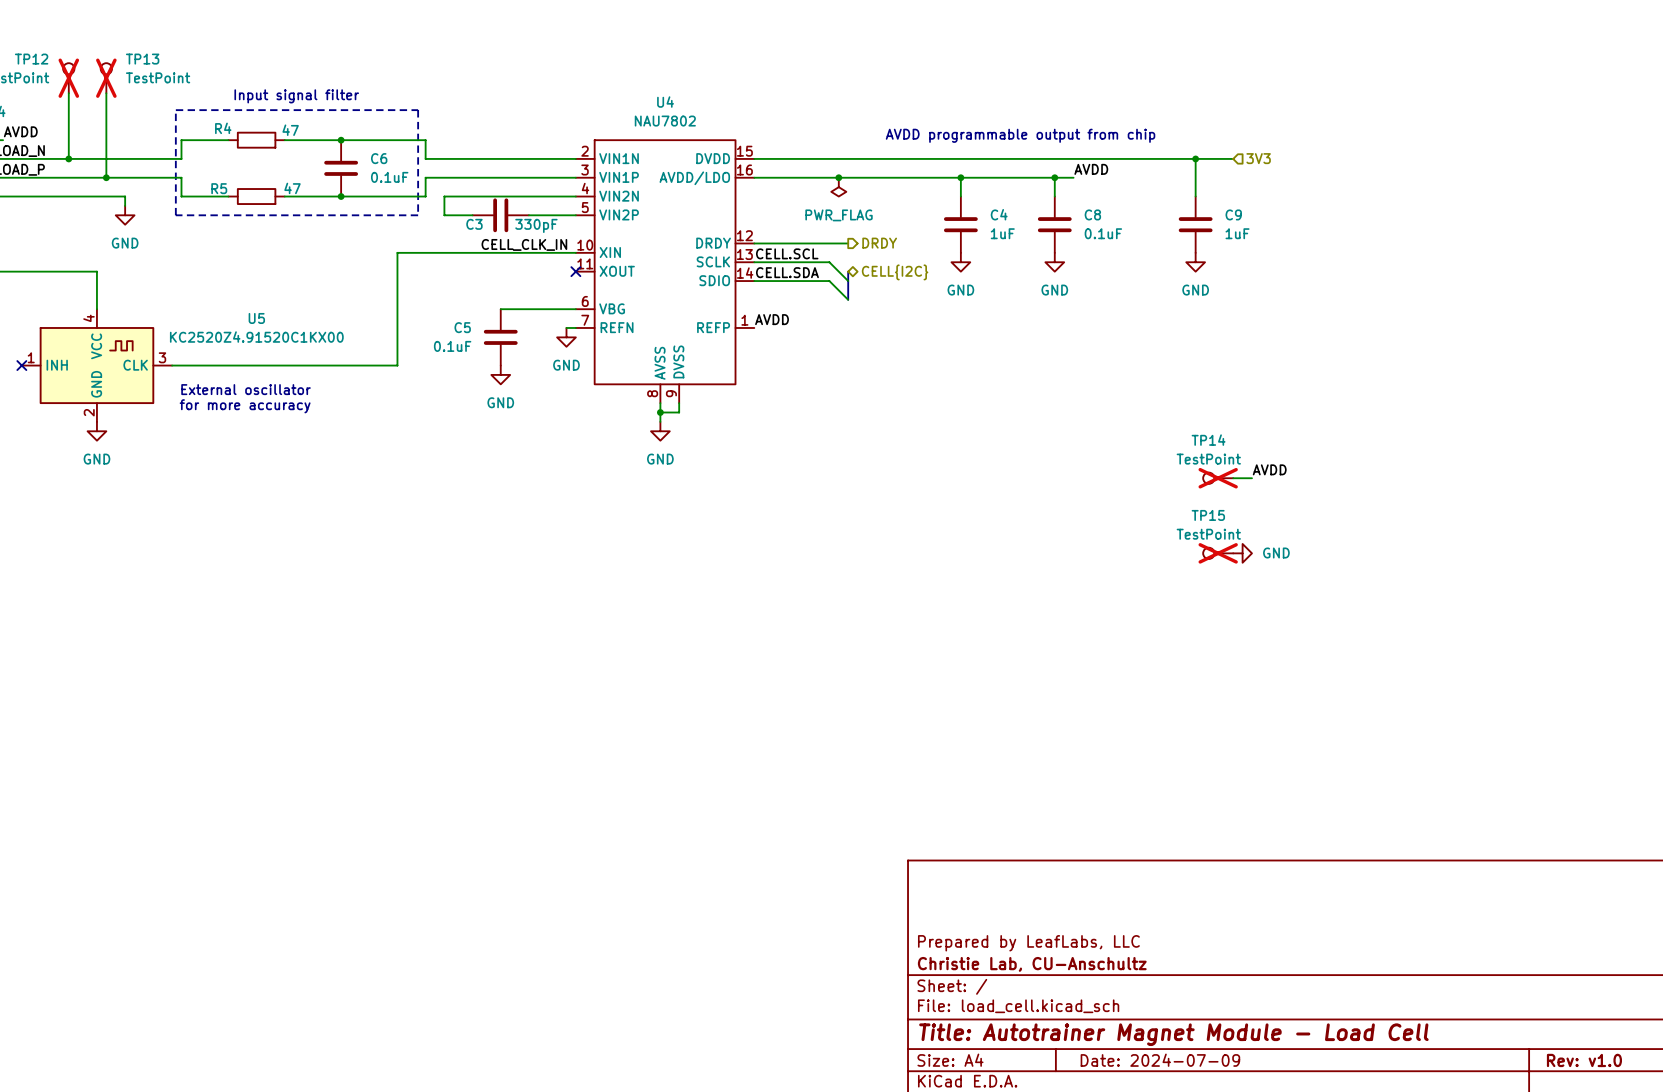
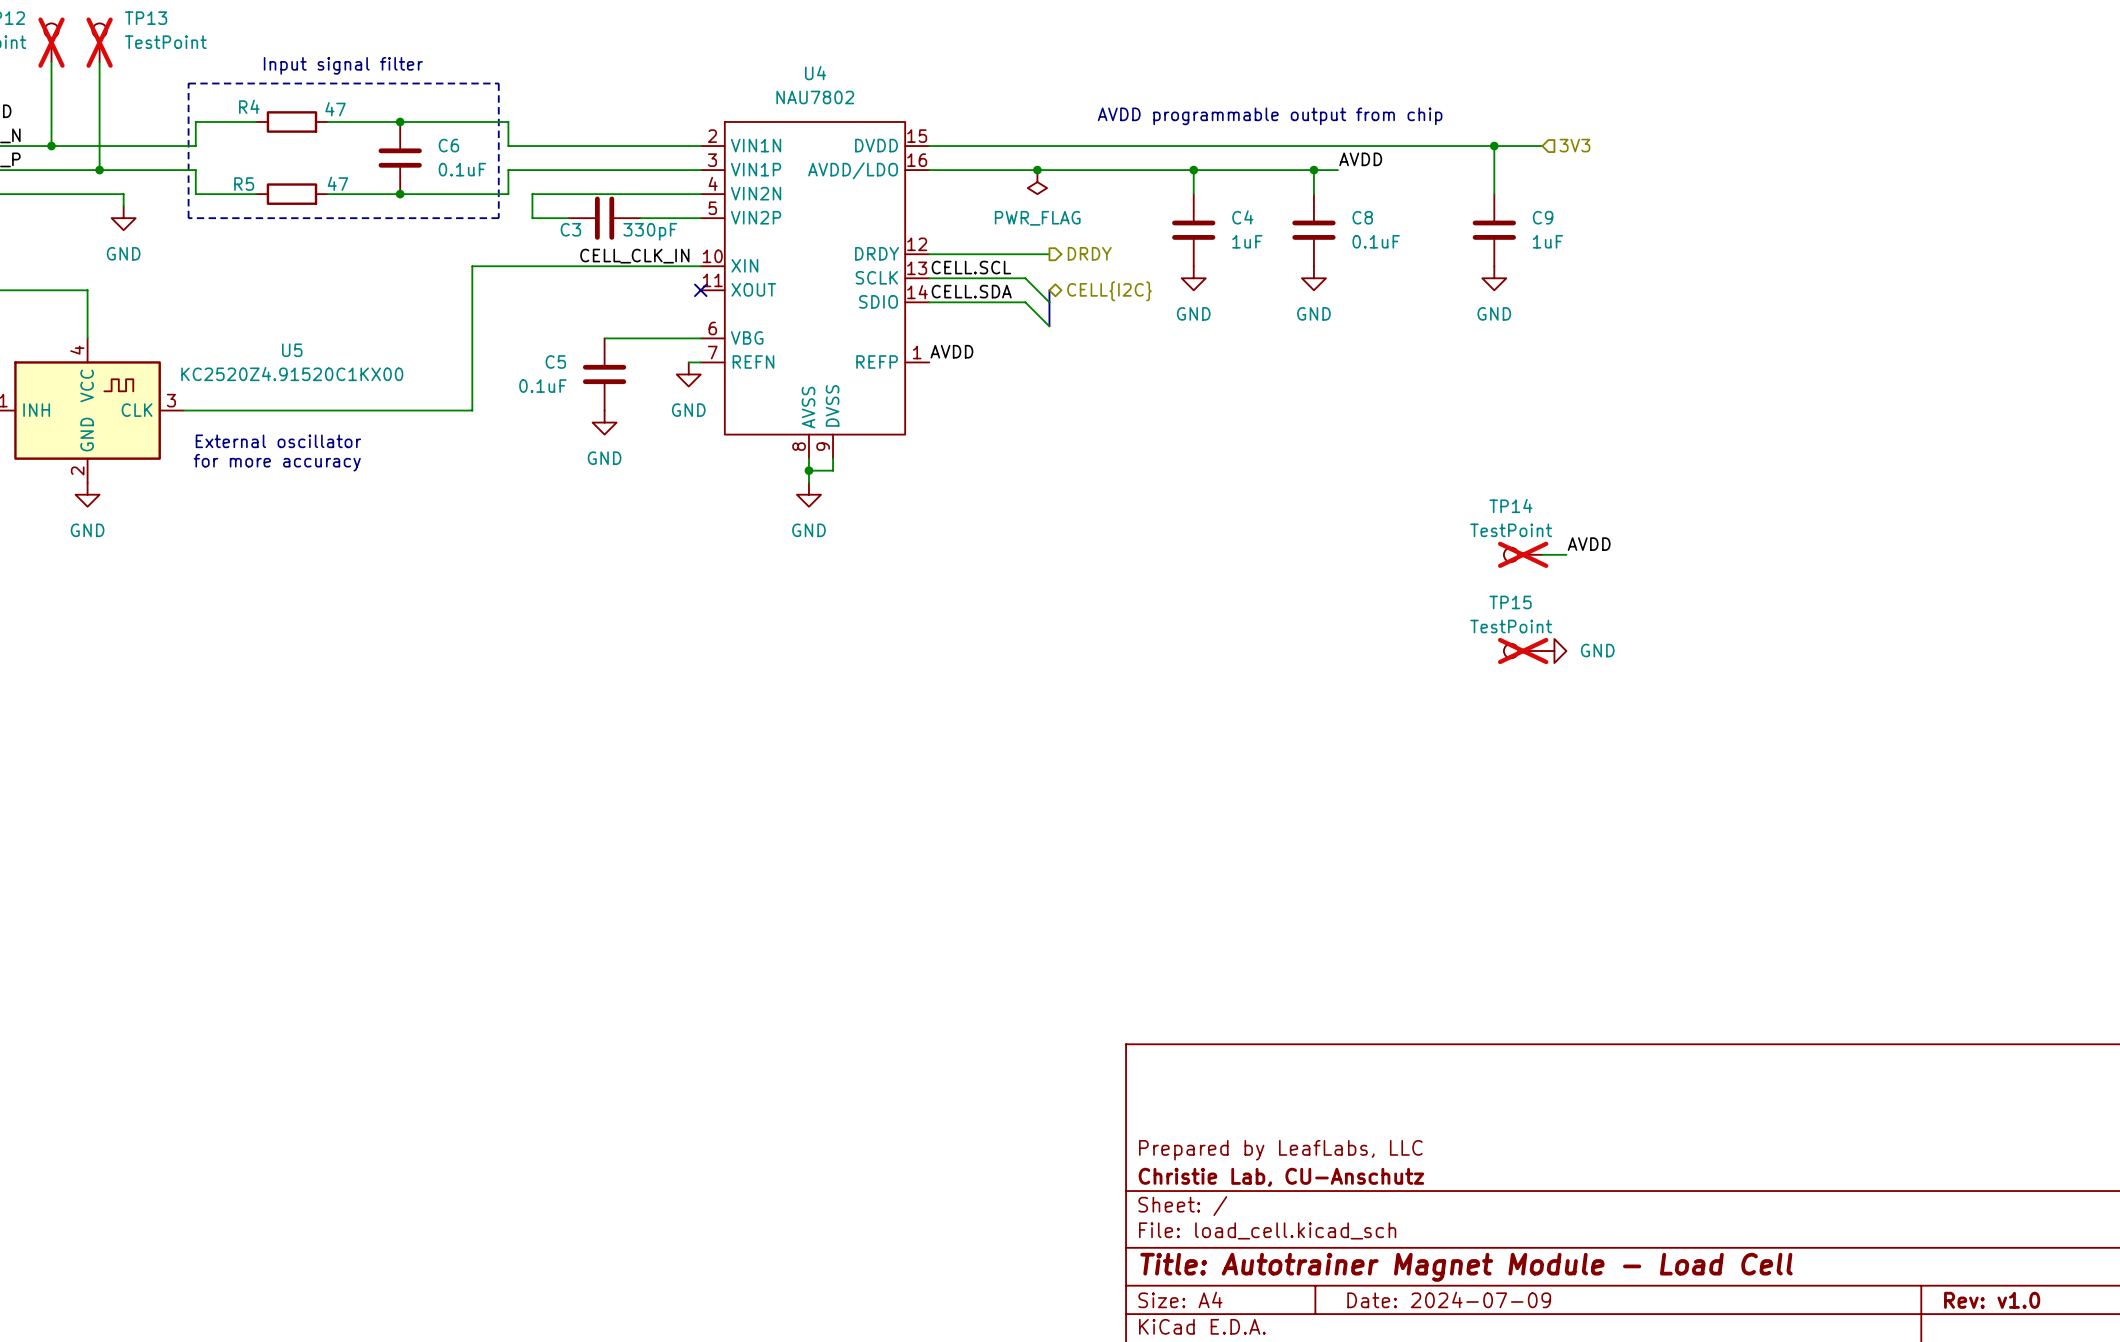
title block: Christie Lab, CU-Anschultz (1032, 964) -> Christie Lab, CU-Anschutz (1281, 1177)

